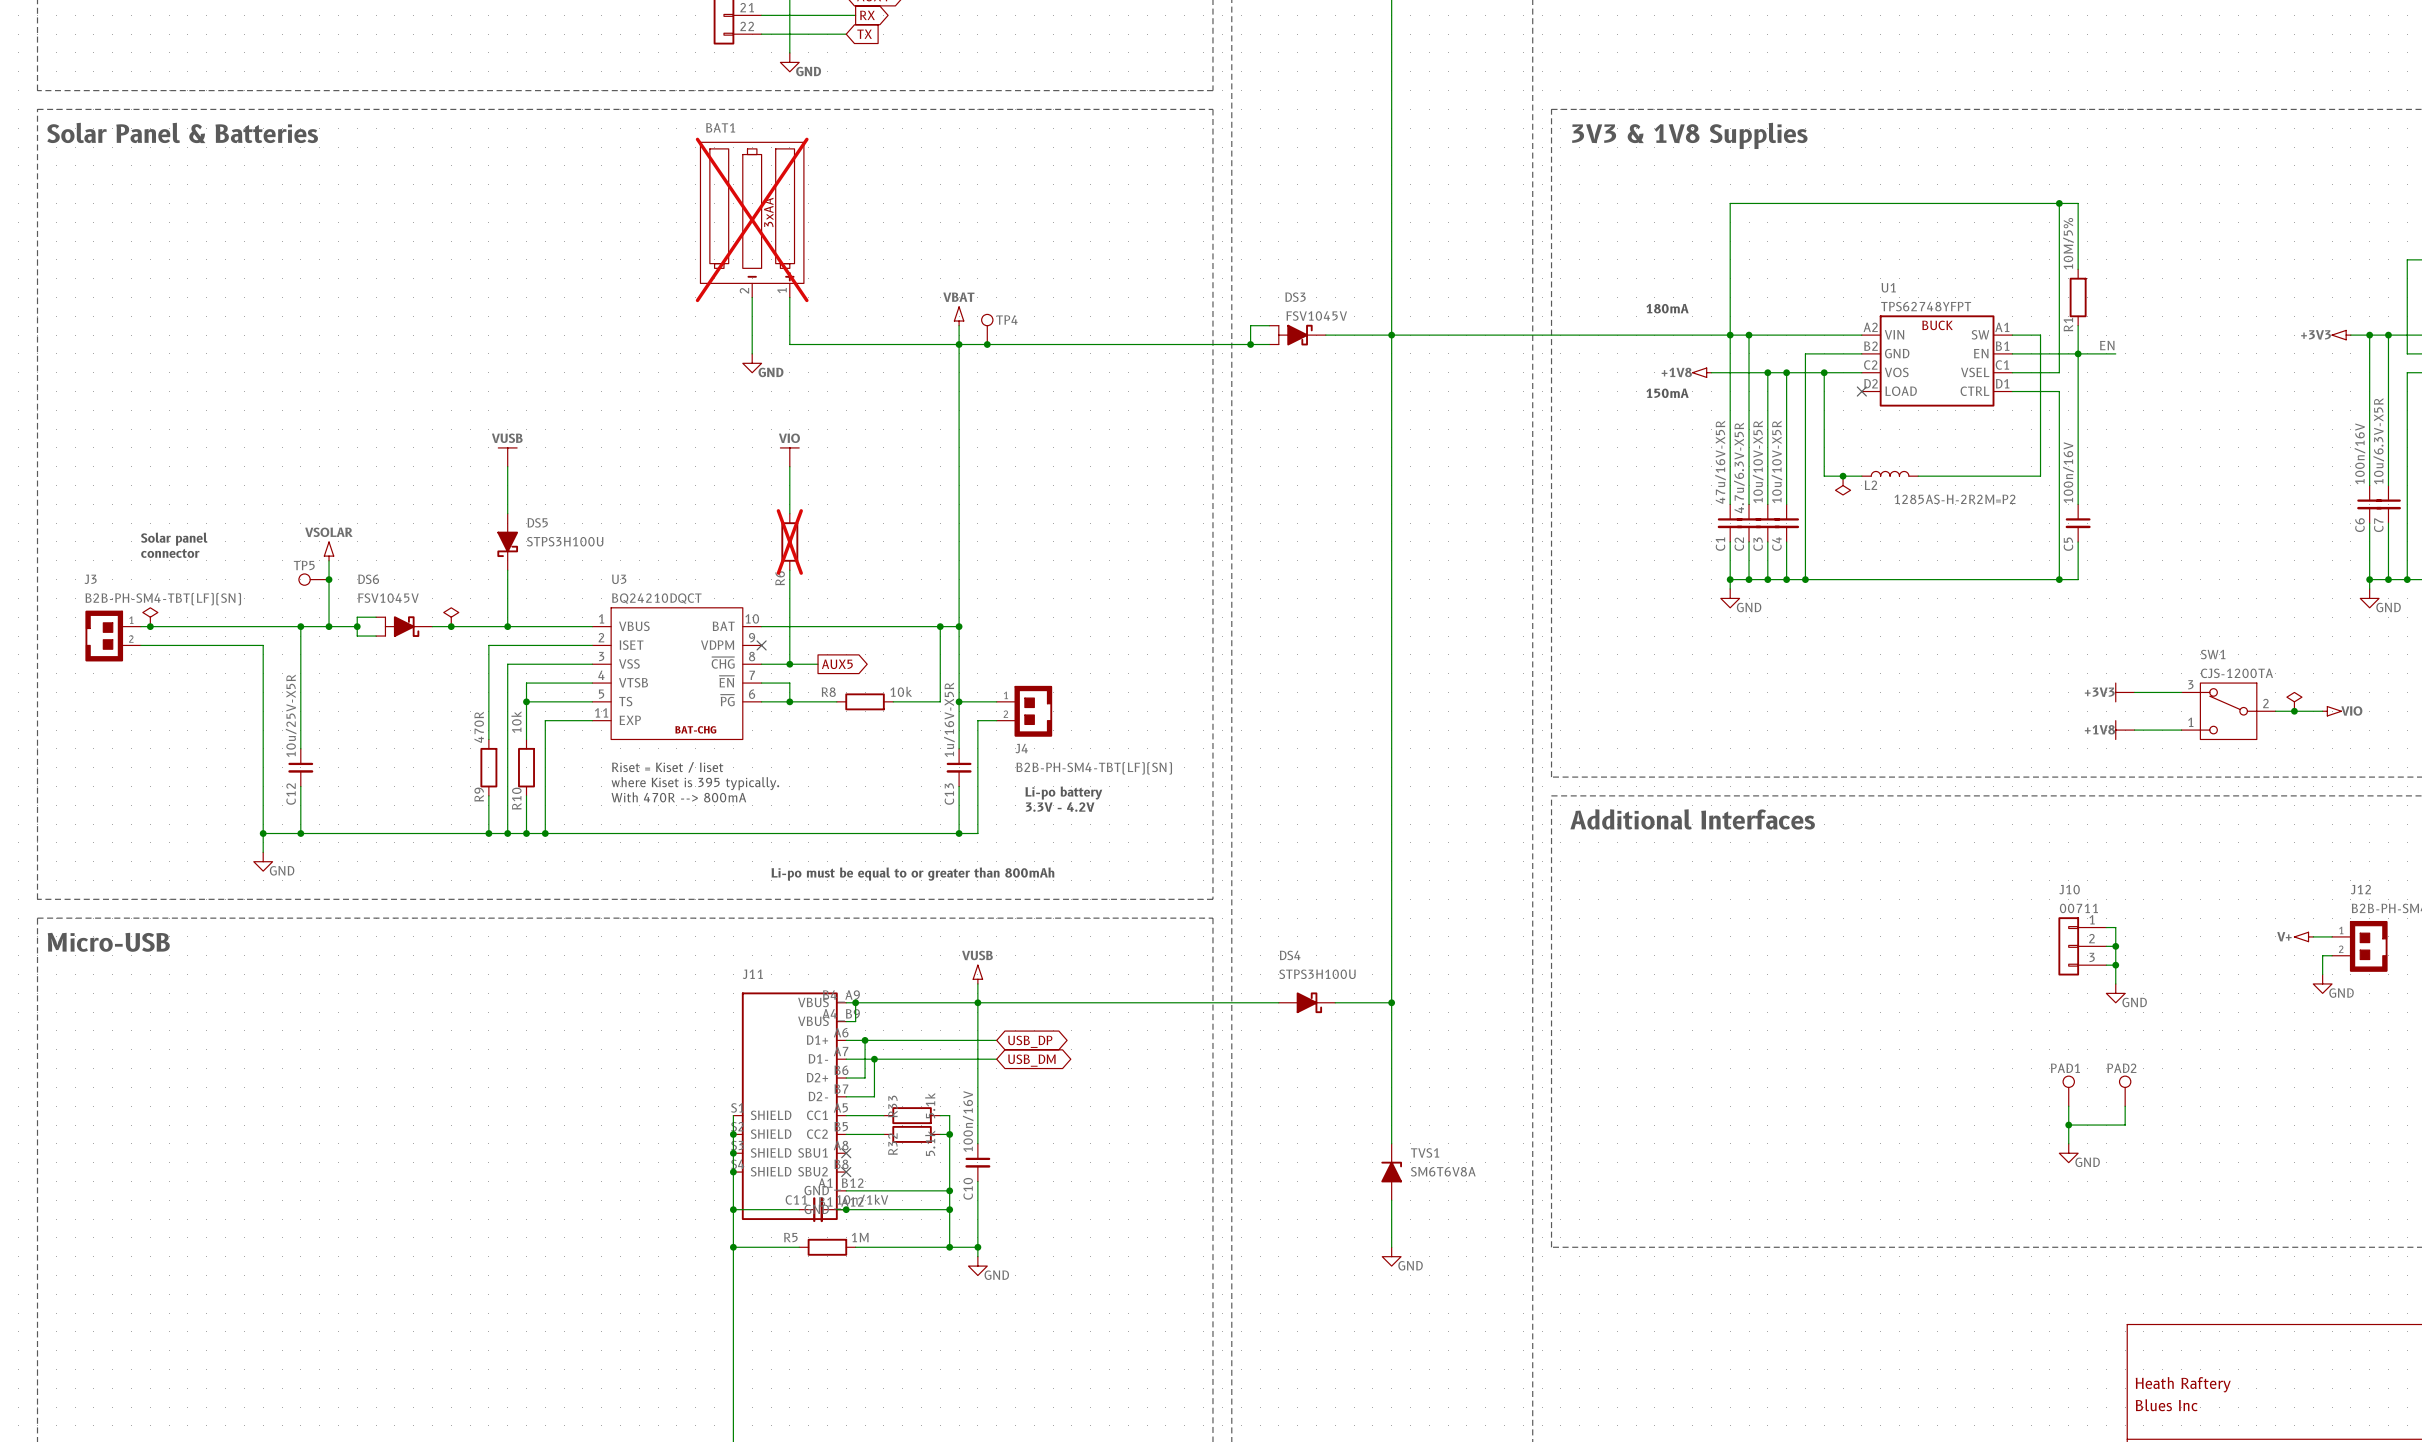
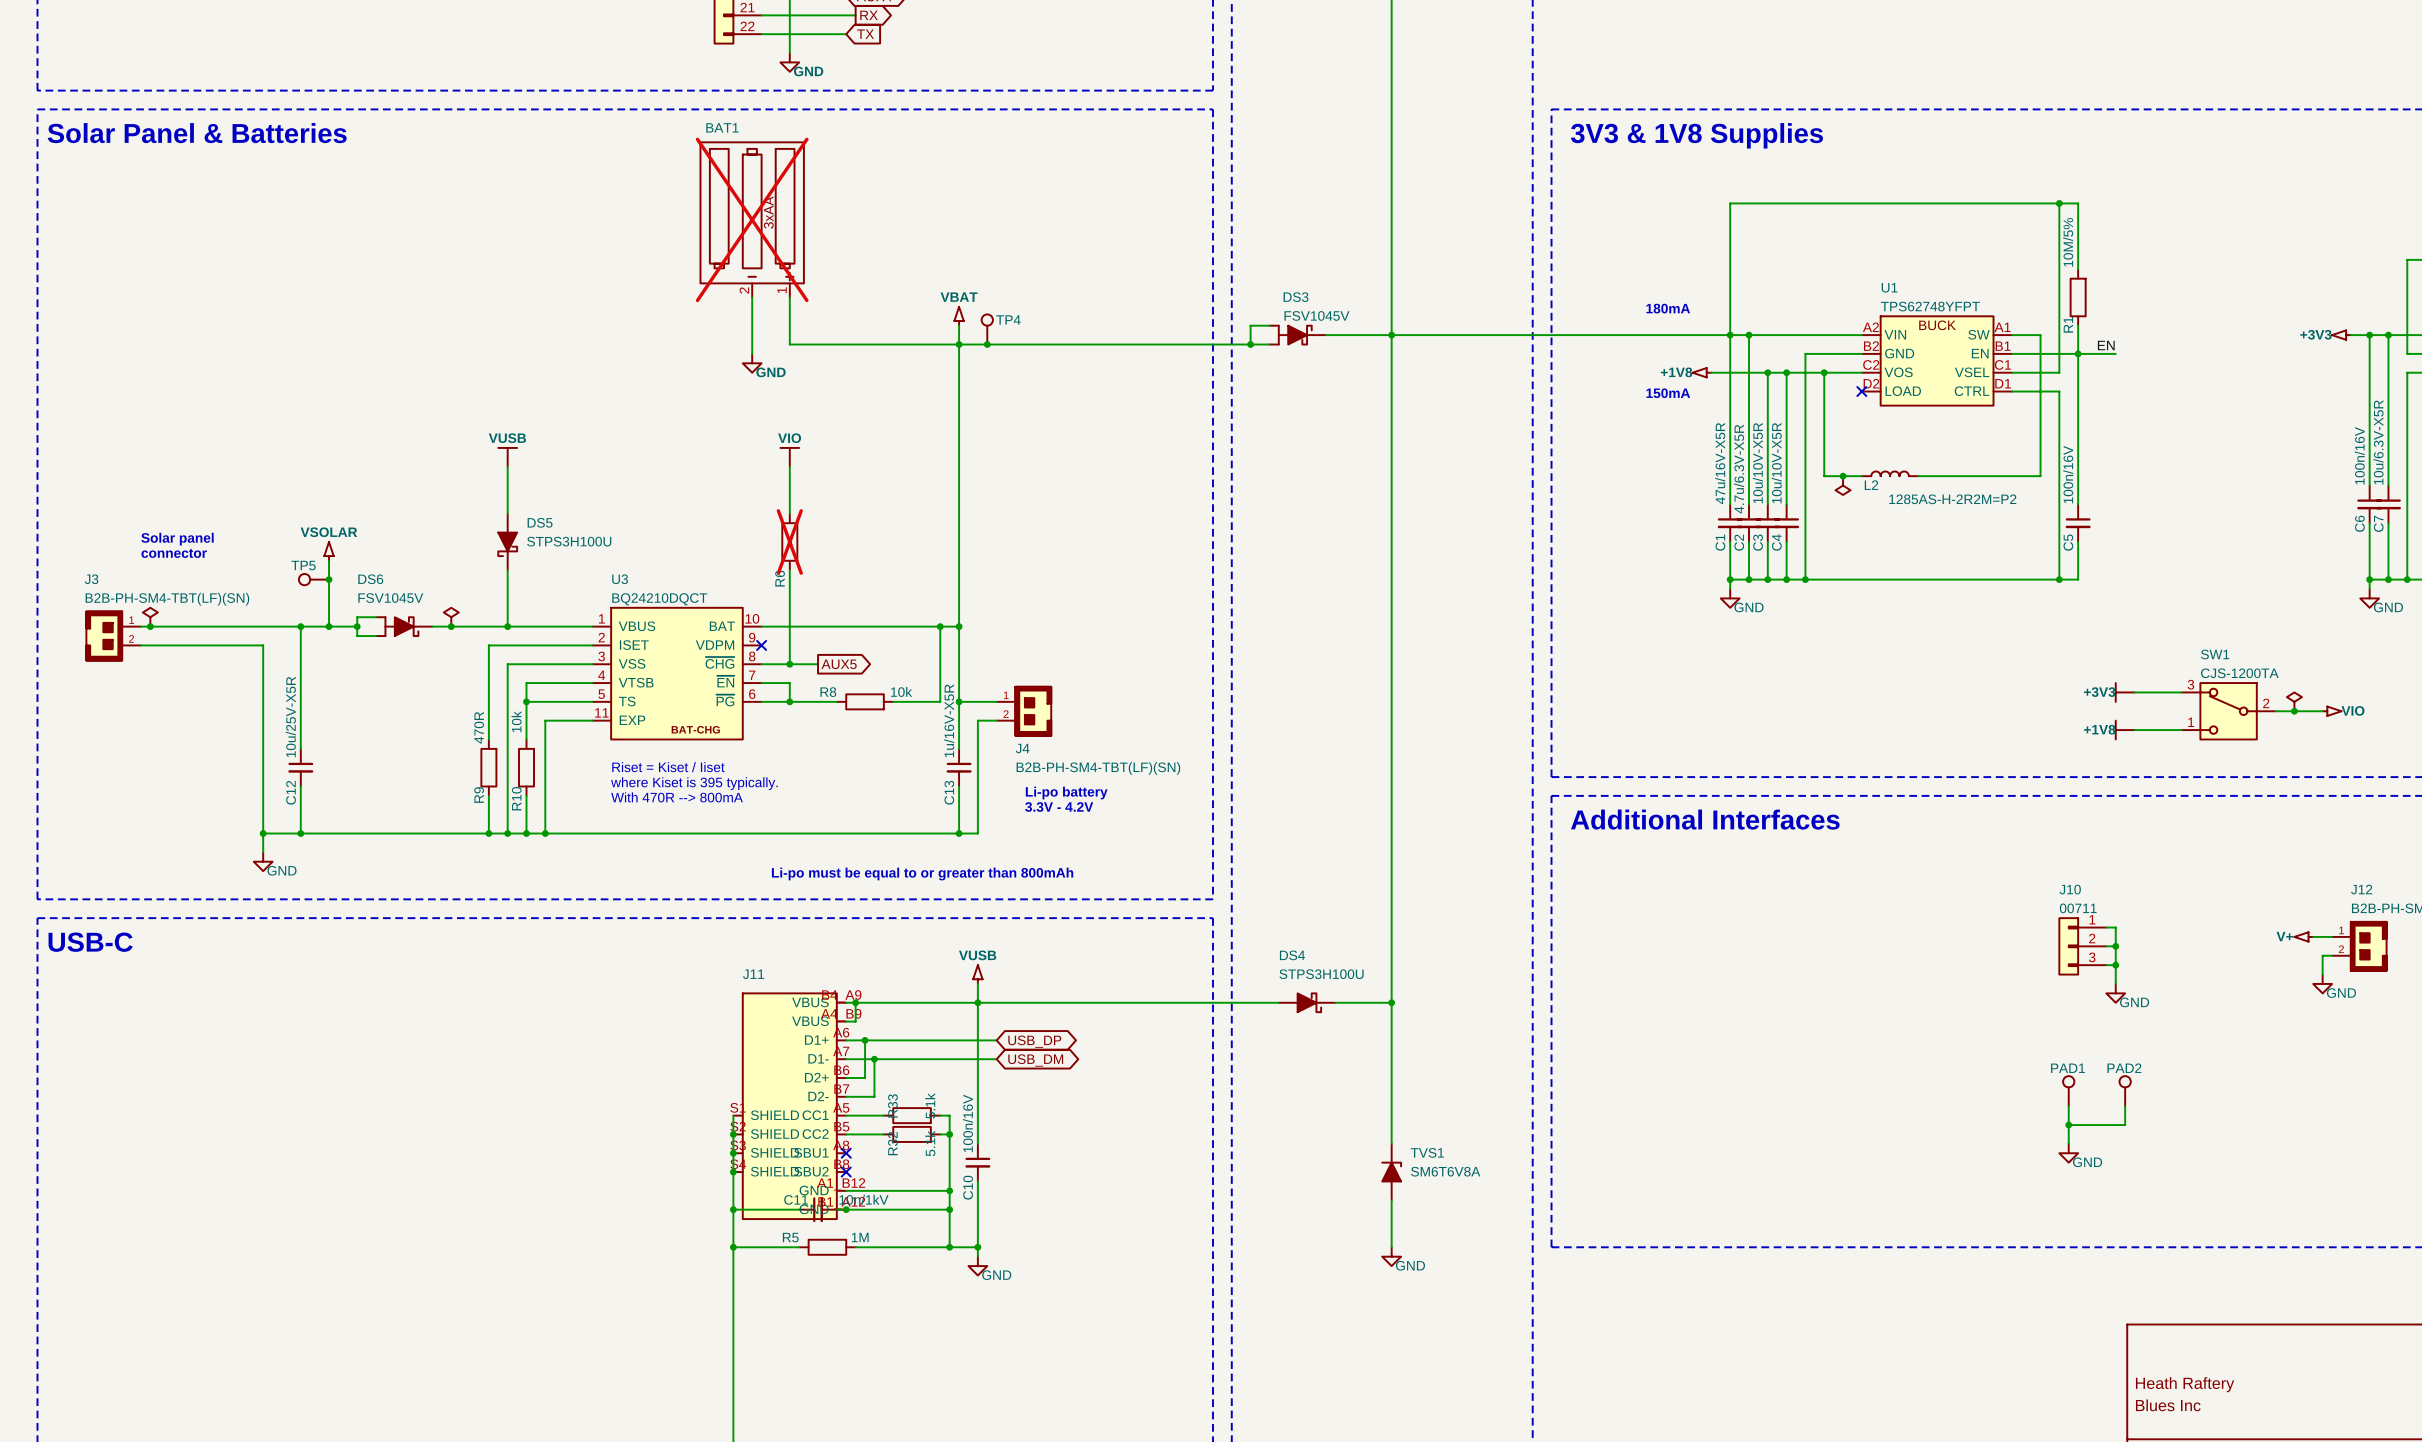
text: Micro-USB (108, 942) -> USB-C (90, 942)

